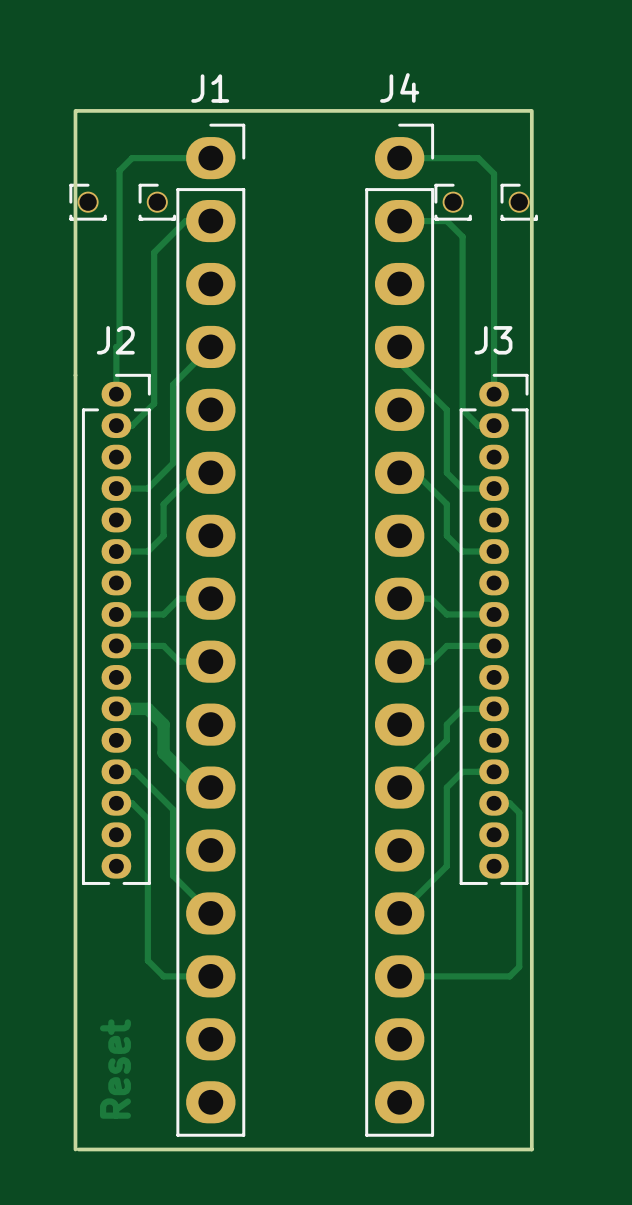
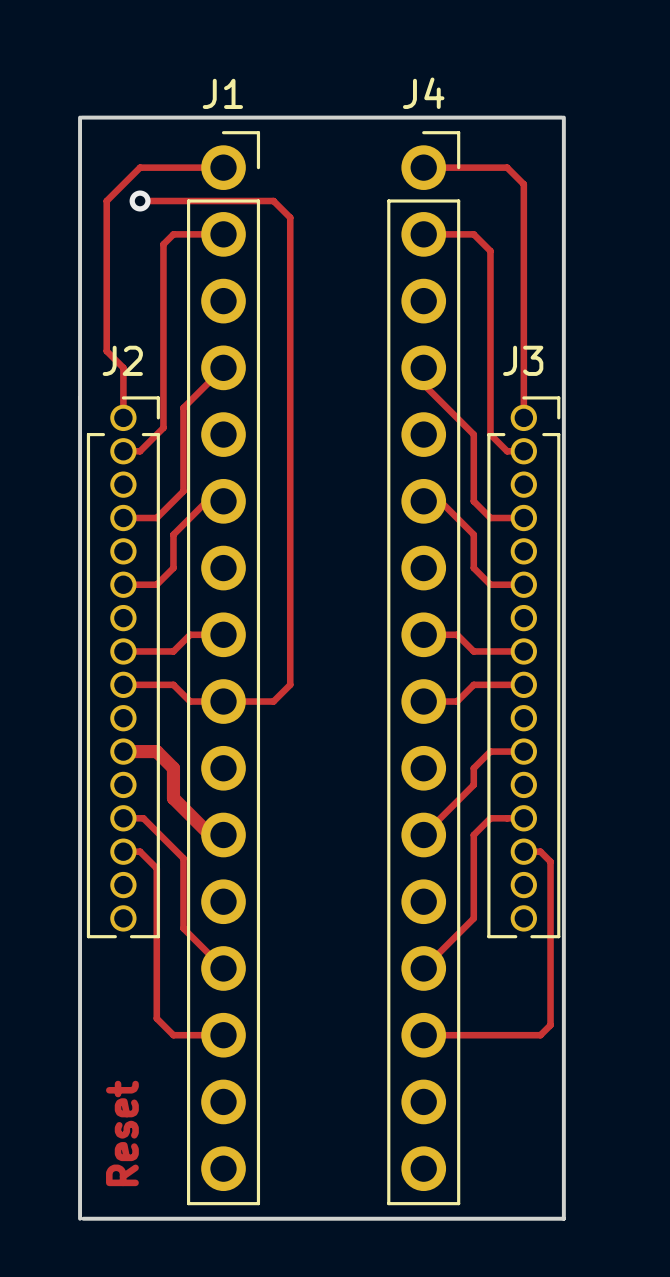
J1 footprint: [176, 123, 246, 1137] -> [186, 131, 261, 1206]
J4 footprint: [365, 123, 435, 1137] -> [387, 131, 461, 1206]
track: (119, 170) (119, 350) (116, 346) -> (126, 180) (106, 201) (106, 351) (123, 367)
track: none -> (140, 201) (273, 201) (290, 217) (290, 684) (273, 701) (223, 701)
via: none -> (140, 201)
part: (88, 202) -> none
part: (157, 202) -> none
part: (453, 202) -> none
part: (519, 202) -> none
track: (185, 221) (154, 252) -> (196, 234) (173, 234) (163, 244) (163, 267)
J2 footprint: [81, 373, 151, 885] -> [86, 396, 160, 939]
J3 footprint: [459, 373, 529, 885] -> [487, 396, 561, 939]

